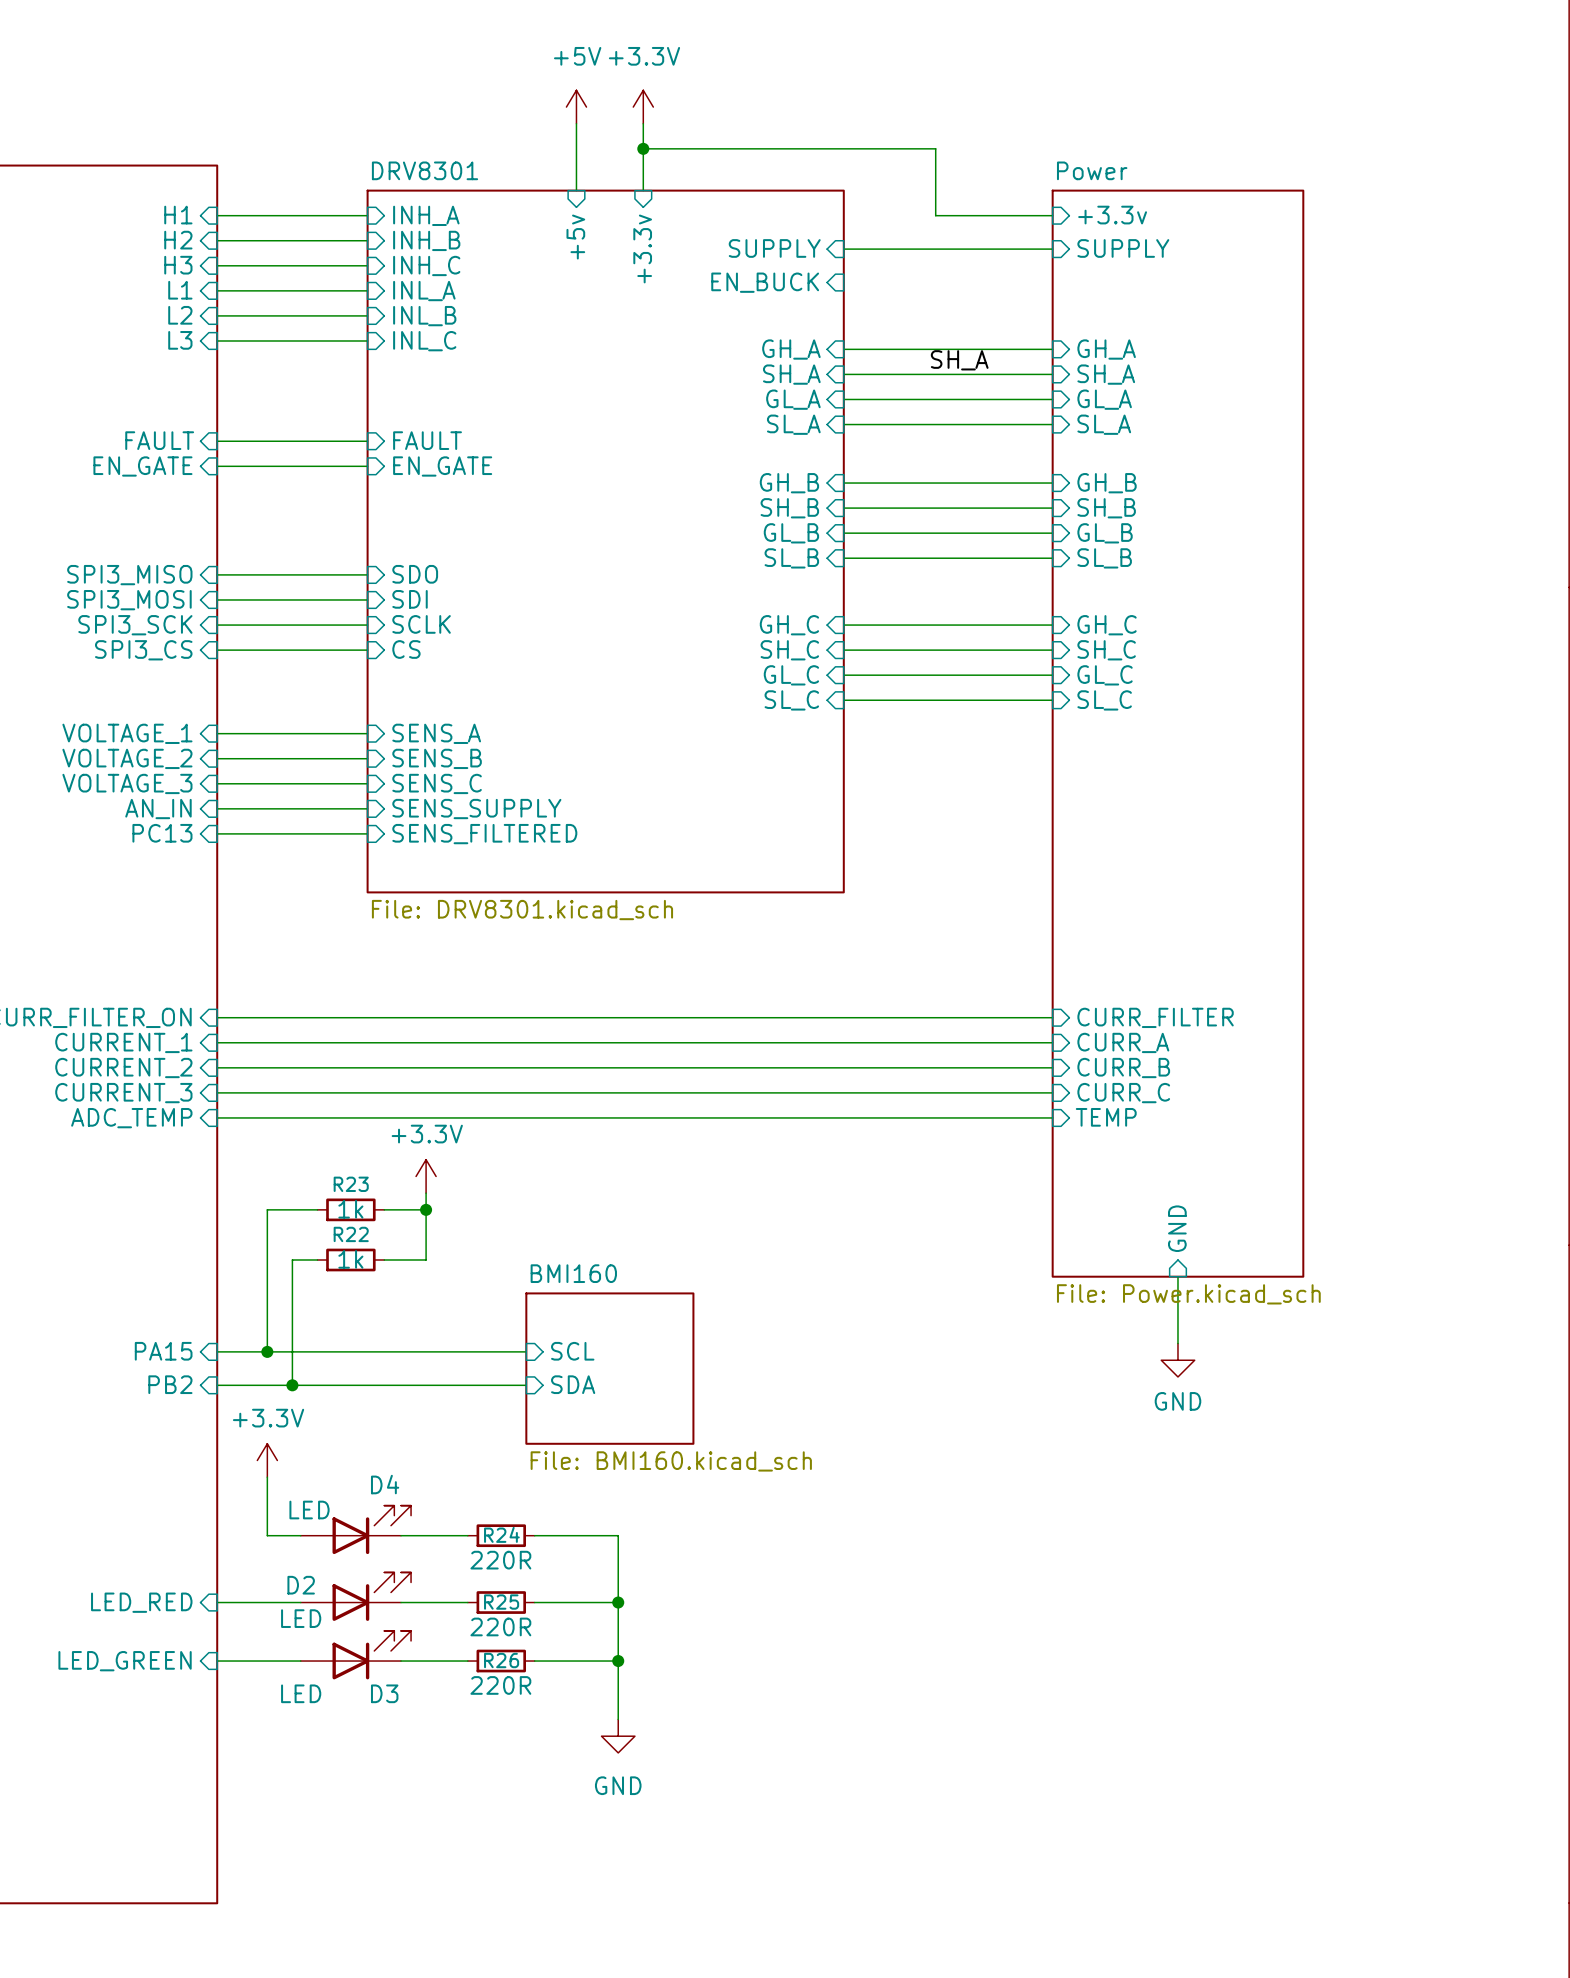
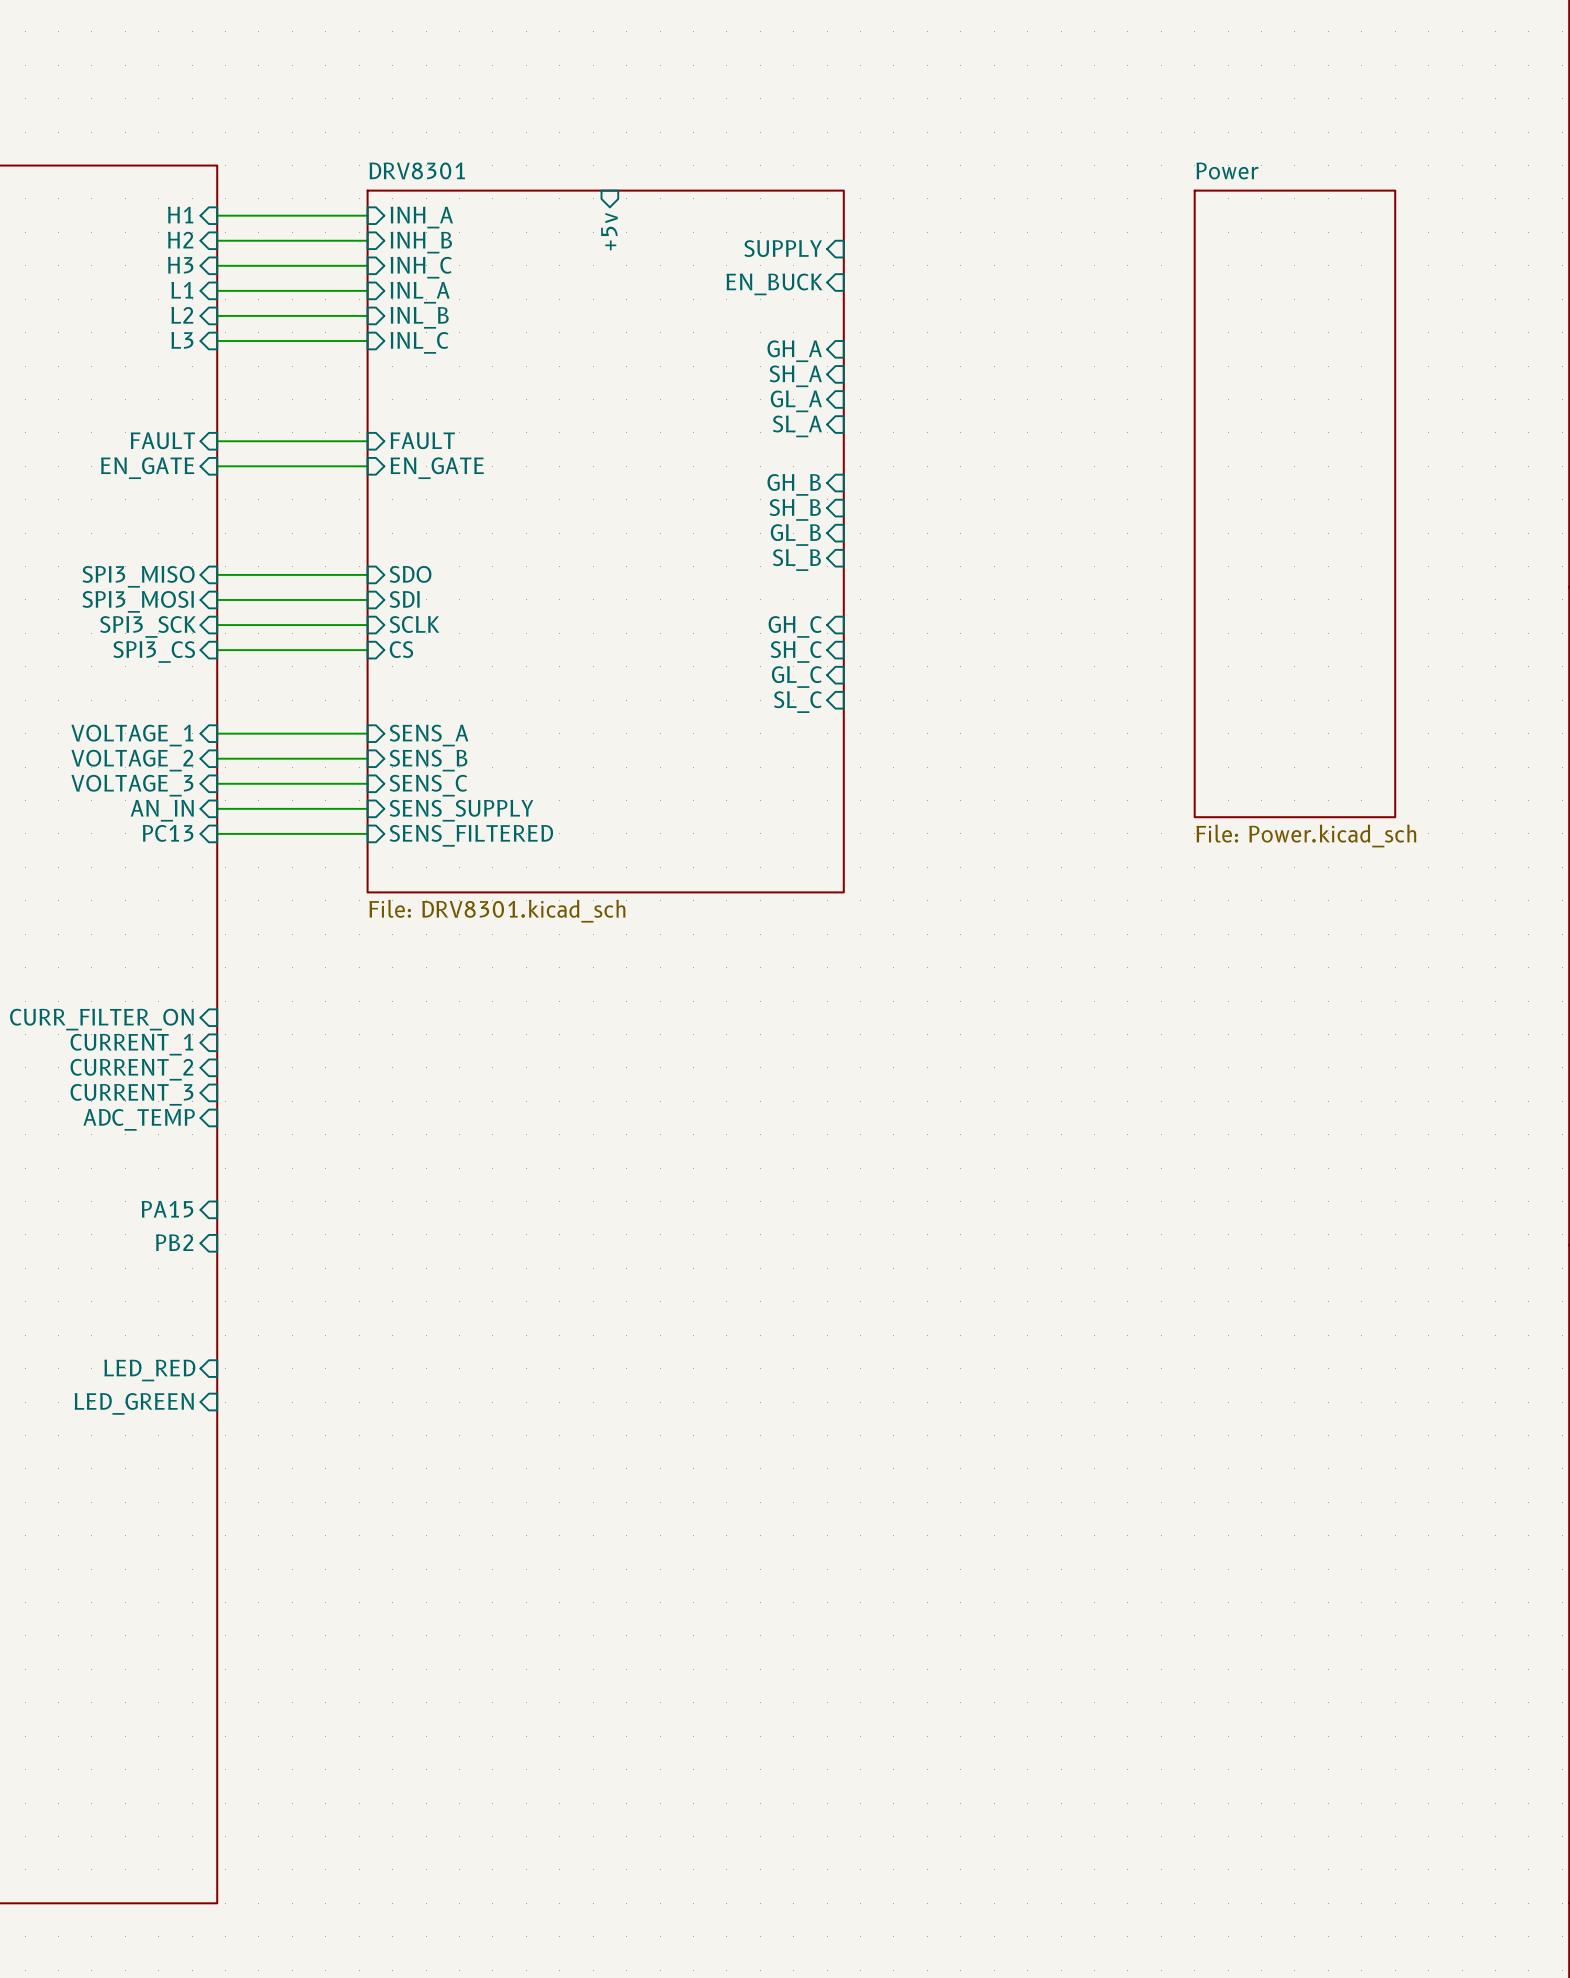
power symbol: +5V (576, 107) -> none
power symbol: +3.3V (643, 107) -> none
wire: (576, 123) (576, 190) -> none
wire: (643, 123) (643, 190) -> none
wire: (643, 148) (935, 148) (935, 215) (1052, 215) -> none
junction: (643, 148) -> none
sheet pin: +3.3v (1112, 215) -> none
sheet pin position: +5v (575, 237) -> +5v (609, 231)
sheet pin: +3.3v (642, 248) -> none
sheet pin: SUPPLY (1123, 248) -> none
wire: (843, 249) (1052, 249) -> none
wire: (843, 349) (1052, 349) -> none
sheet pin: GH_A (1106, 349) -> none
label: SH_A (959, 360) -> none
wire: (843, 374) (1052, 374) -> none
sheet pin: SH_A (1106, 374) -> none
wire: (843, 399) (1052, 399) -> none
sheet pin: GL_A (1104, 399) -> none
wire: (843, 424) (1052, 424) -> none
sheet pin: SL_A (1104, 424) -> none
wire: (843, 483) (1052, 483) -> none
sheet pin: GH_B (1107, 483) -> none
sheet Power: none -> File: Power.kicad_sch (1294, 503)
wire: (843, 508) (1052, 508) -> none
sheet pin: SH_B (1106, 508) -> none
wire: (843, 533) (1052, 533) -> none
sheet pin: GL_B (1105, 533) -> none
wire: (843, 558) (1052, 558) -> none
sheet pin: SL_B (1104, 558) -> none
wire: (843, 625) (1052, 625) -> none
sheet pin: GH_C (1107, 625) -> none
wire: (843, 650) (1052, 650) -> none
sheet pin: SH_C (1106, 650) -> none
wire: (843, 675) (1052, 675) -> none
sheet pin: GL_C (1105, 675) -> none
wire: (843, 700) (1052, 700) -> none
sheet pin: SL_C (1104, 700) -> none
sheet Power: File: Power.kicad_sch (1177, 733) -> none
wire: (217, 1017) (1052, 1017) -> none
sheet pin: CURR_FILTER (1155, 1017) -> none
wire: (217, 1042) (1052, 1042) -> none
sheet pin: CURR_A (1123, 1042) -> none
wire: (217, 1067) (1052, 1067) -> none
sheet pin: CURR_B (1123, 1068) -> none
wire: (217, 1092) (1052, 1092) -> none
sheet pin: CURR_C (1123, 1093) -> none
wire: (217, 1117) (1052, 1117) -> none
sheet pin: TEMP (1106, 1117) -> none
power symbol: +3.3V (426, 1176) -> none
wire: (426, 1193) (426, 1259) (384, 1259) -> none
wire: (317, 1209) (267, 1209) (267, 1351) -> none
R23: 1k (350, 1209) -> none
wire: (384, 1209) (426, 1209) -> none
junction: (426, 1209) -> none
sheet pin: GND (1177, 1228) -> none
wire: (317, 1259) (292, 1259) (292, 1385) -> none
R22: 1k (350, 1259) -> none
wire: (1177, 1276) (1177, 1343) -> none
sheet pin position: PA15 (163, 1351) -> PA15 (167, 1209)
wire: (217, 1351) (526, 1351) -> none
junction: (267, 1351) -> none
sheet pin: SCL (572, 1351) -> none
power symbol: GND (1177, 1360) -> none
sheet BMI160: File: BMI160.kicad_sch (609, 1368) -> none
sheet pin position: PB2 (170, 1384) -> PB2 (174, 1242)
sheet pin: SDA (573, 1384) -> none
wire: (217, 1385) (526, 1385) -> none
junction: (292, 1385) -> none
power symbol: +3.3V (267, 1460) -> none
wire: (267, 1477) (267, 1535) (300, 1535) -> none
D4: LED (355, 1529) -> none
wire: (401, 1535) (467, 1535) -> none
R24: 220R (501, 1535) -> none
wire: (534, 1535) (618, 1535) (618, 1719) -> none
D2: LED (355, 1596) -> none
sheet pin position: LED_RED (141, 1602) -> LED_RED (149, 1370)
wire: (217, 1602) (300, 1602) -> none
wire: (401, 1602) (467, 1602) -> none
R25: 220R (501, 1602) -> none
wire: (534, 1602) (618, 1602) -> none
junction: (618, 1602) -> none
D3: LED (355, 1655) -> none
sheet pin position: LED_GREEN (125, 1661) -> LED_GREEN (134, 1403)
wire: (217, 1661) (300, 1661) -> none
wire: (401, 1661) (467, 1661) -> none
R26: 220R (501, 1661) -> none
wire: (534, 1661) (618, 1661) -> none
junction: (618, 1661) -> none
power symbol: GND (618, 1736) -> none

